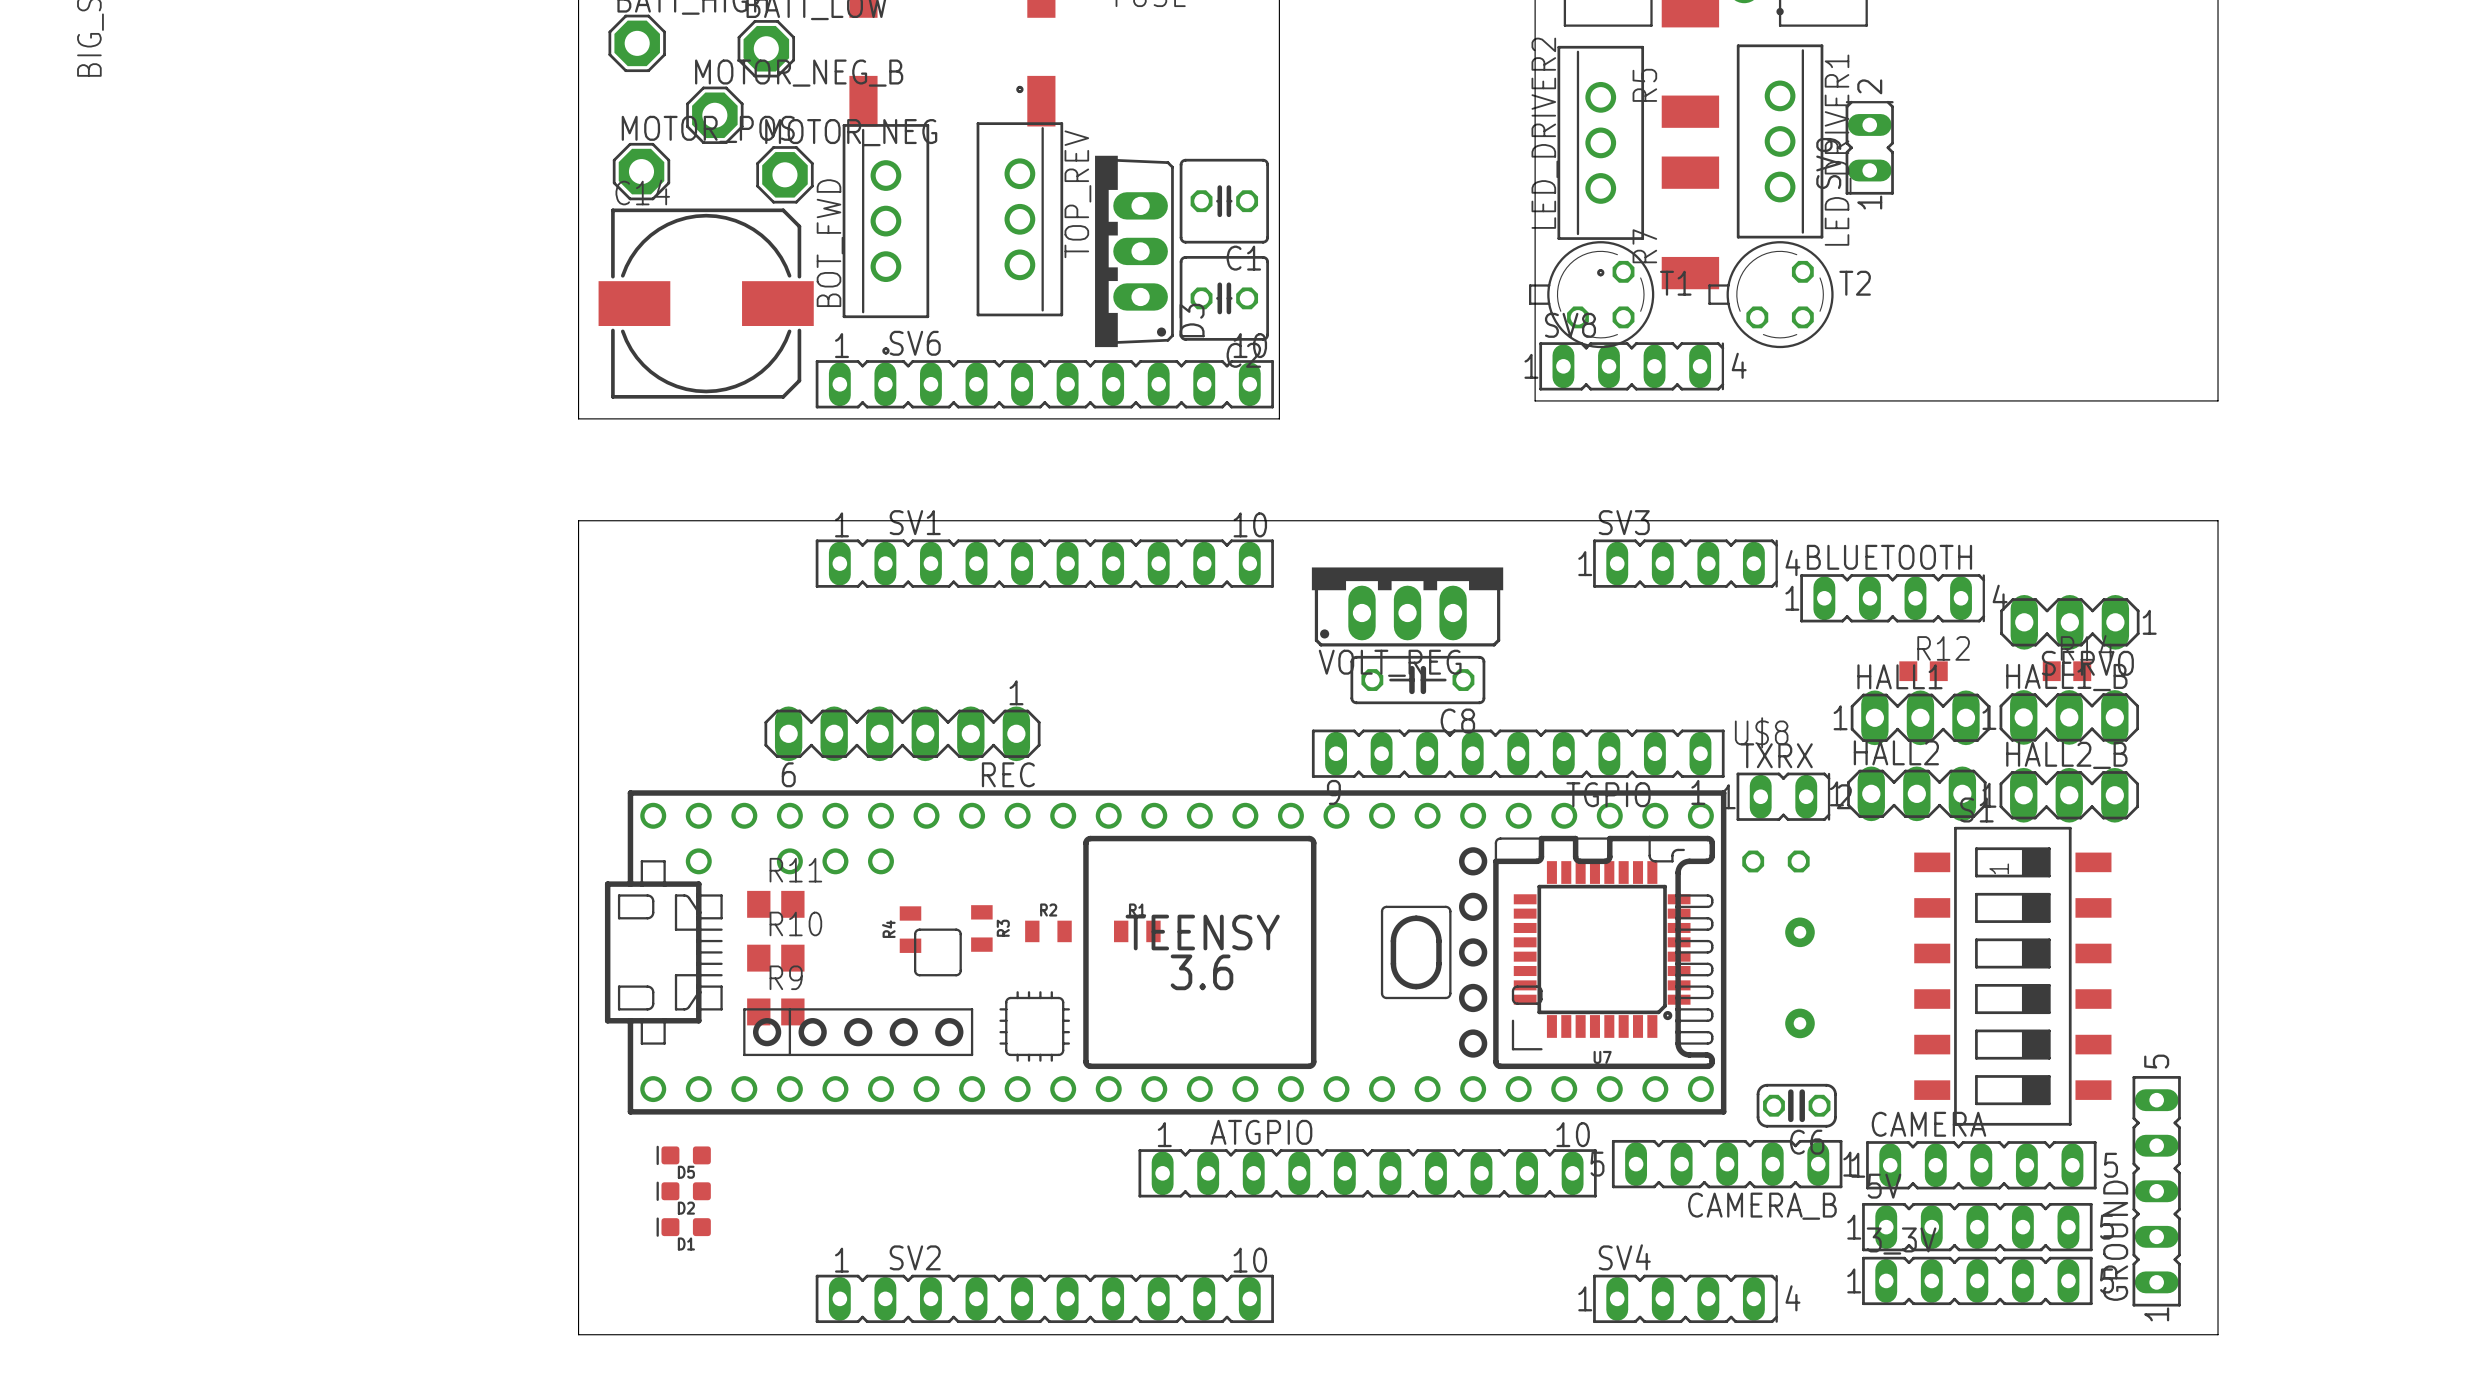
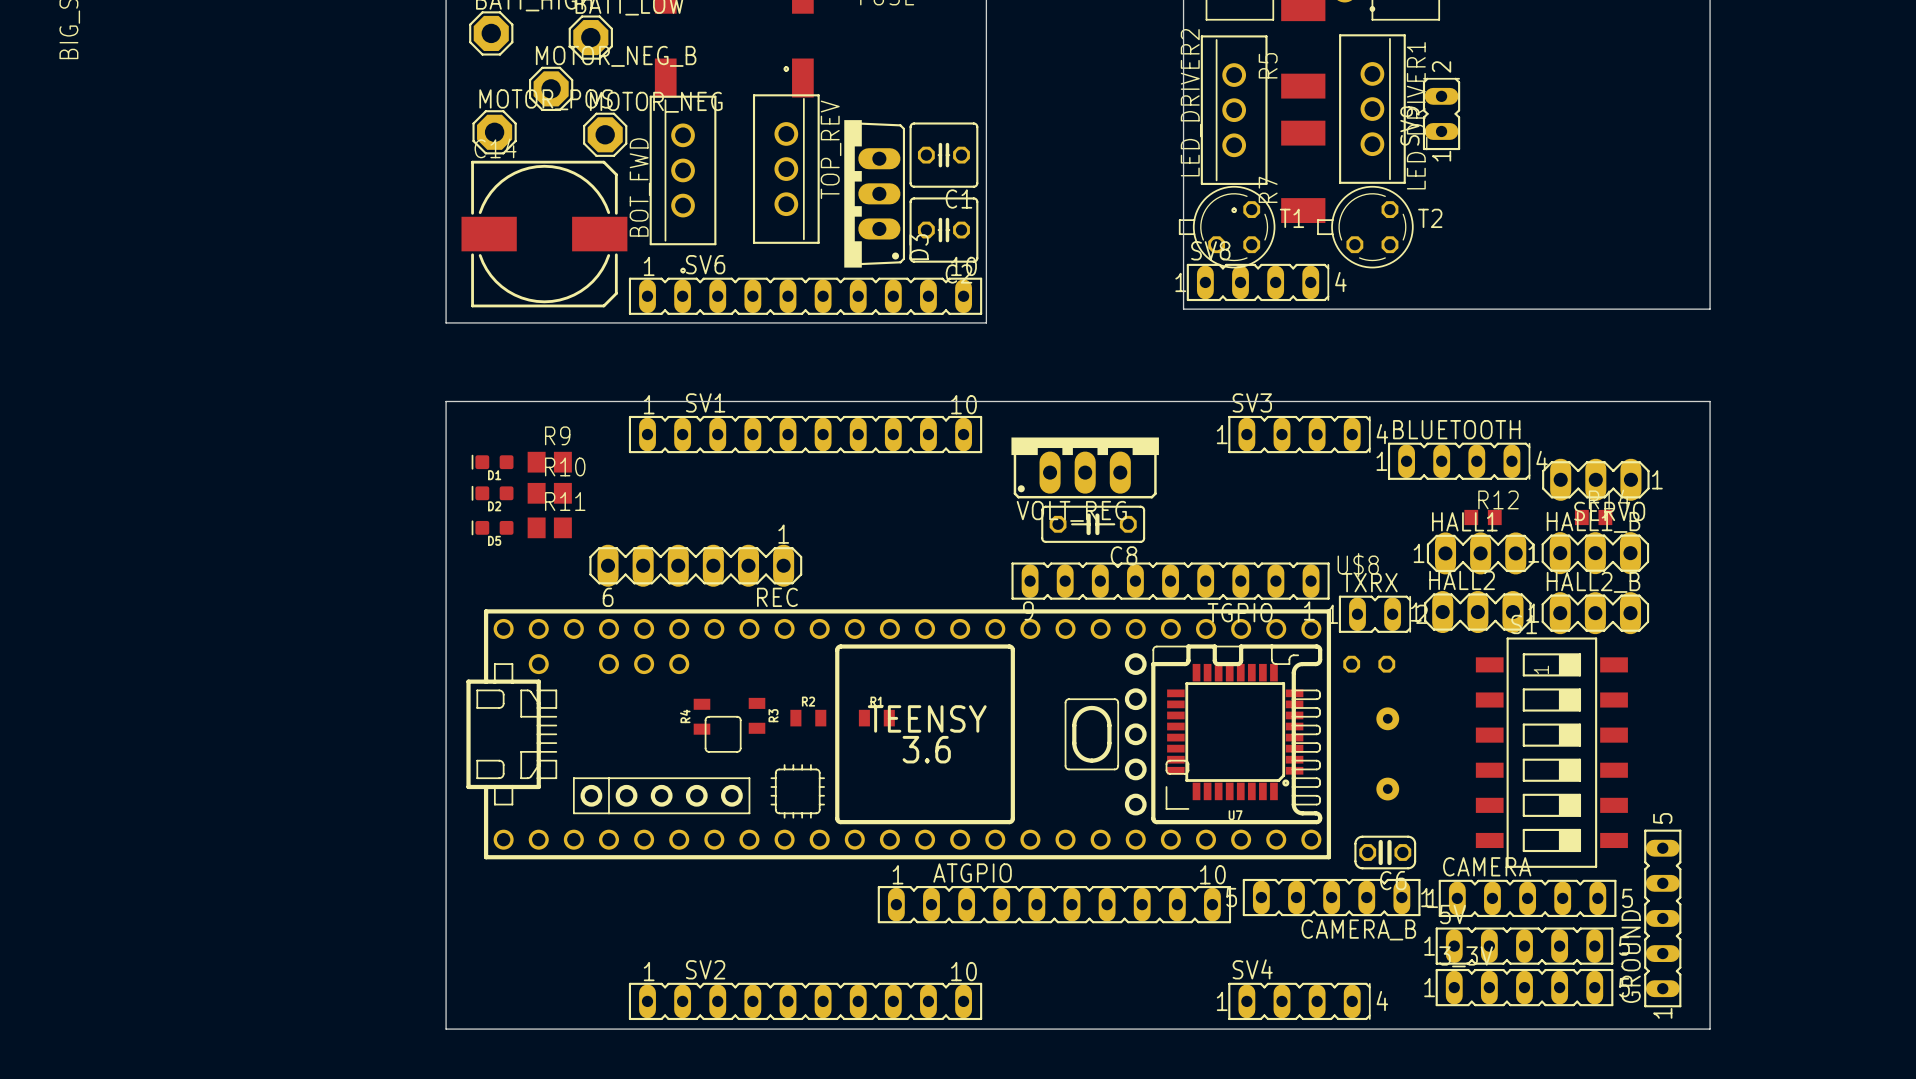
R11 position: (775, 904) -> (549, 527)
R10 position: (775, 958) -> (549, 493)
R9 position: (775, 1011) -> (549, 462)
D5 position: (683, 1155) -> (492, 527)
D2 position: (683, 1191) -> (492, 493)
D1 position: (683, 1227) -> (492, 462)

